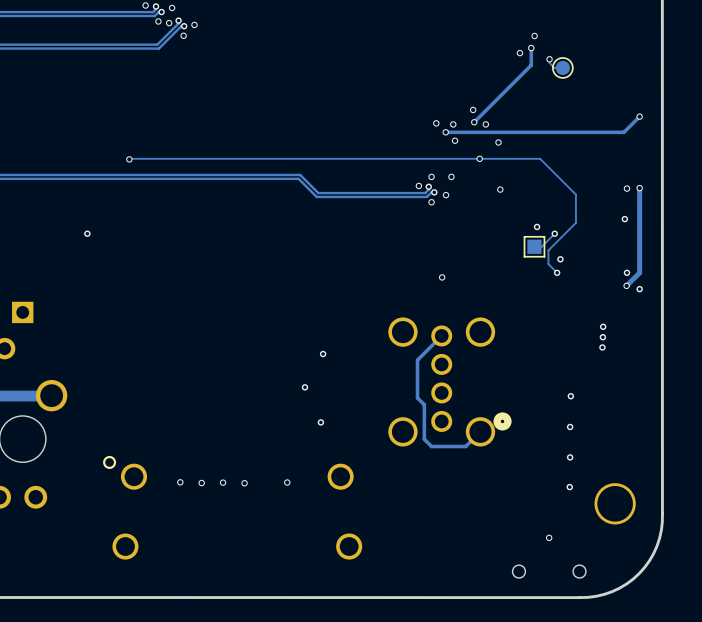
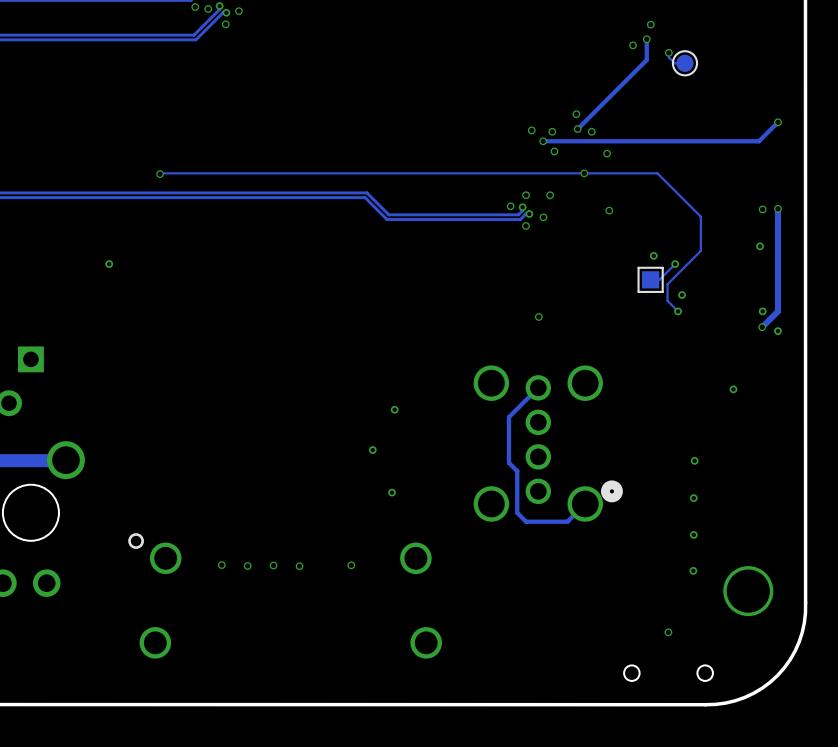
via: (603, 326) -> none
via: (602, 347) -> none

